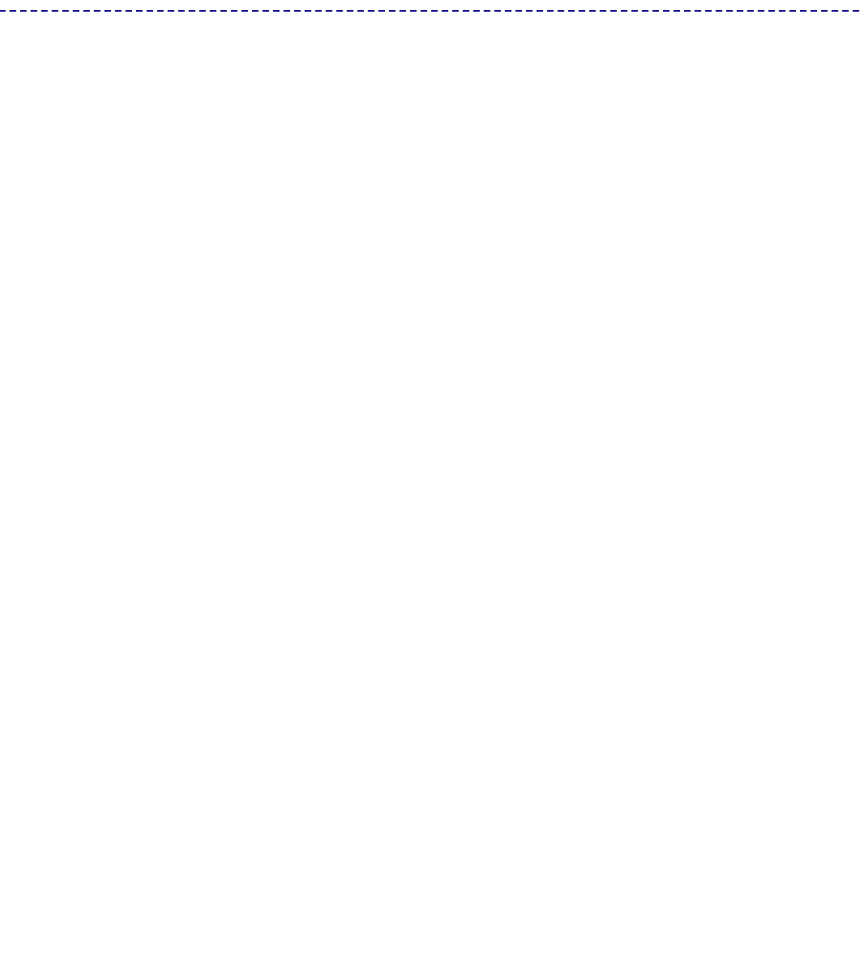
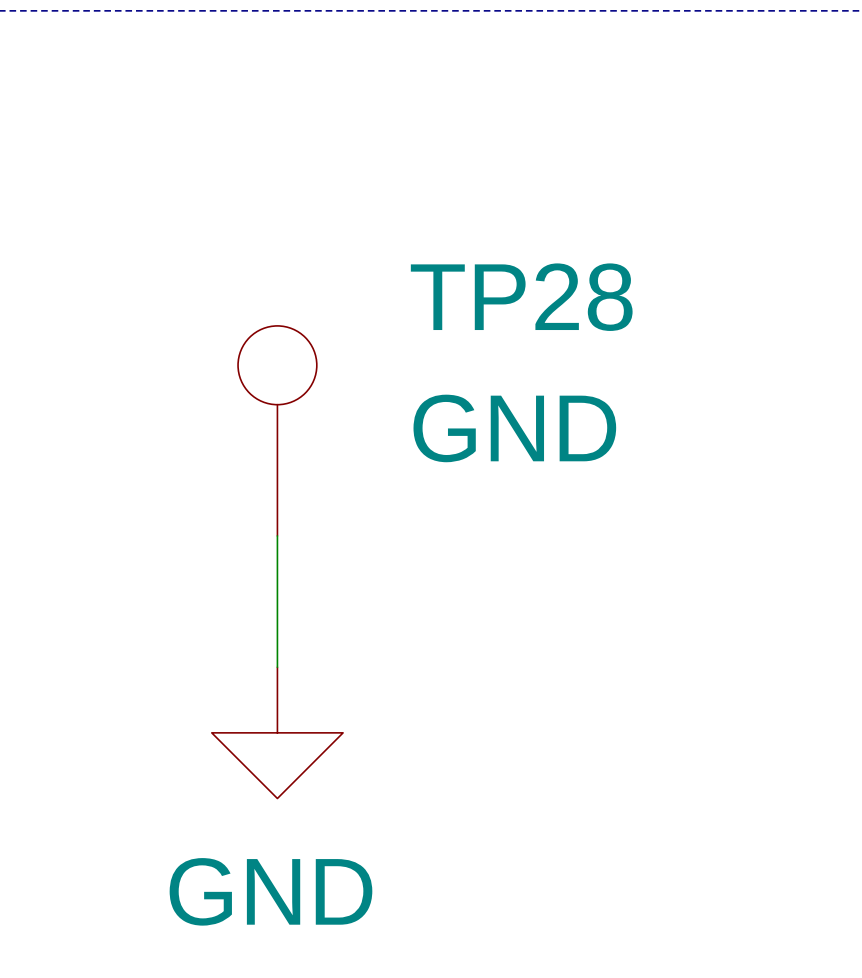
TP28: none -> GND (277, 430)
wire: none -> (277, 535) (277, 667)
power symbol: none -> GND (277, 732)

